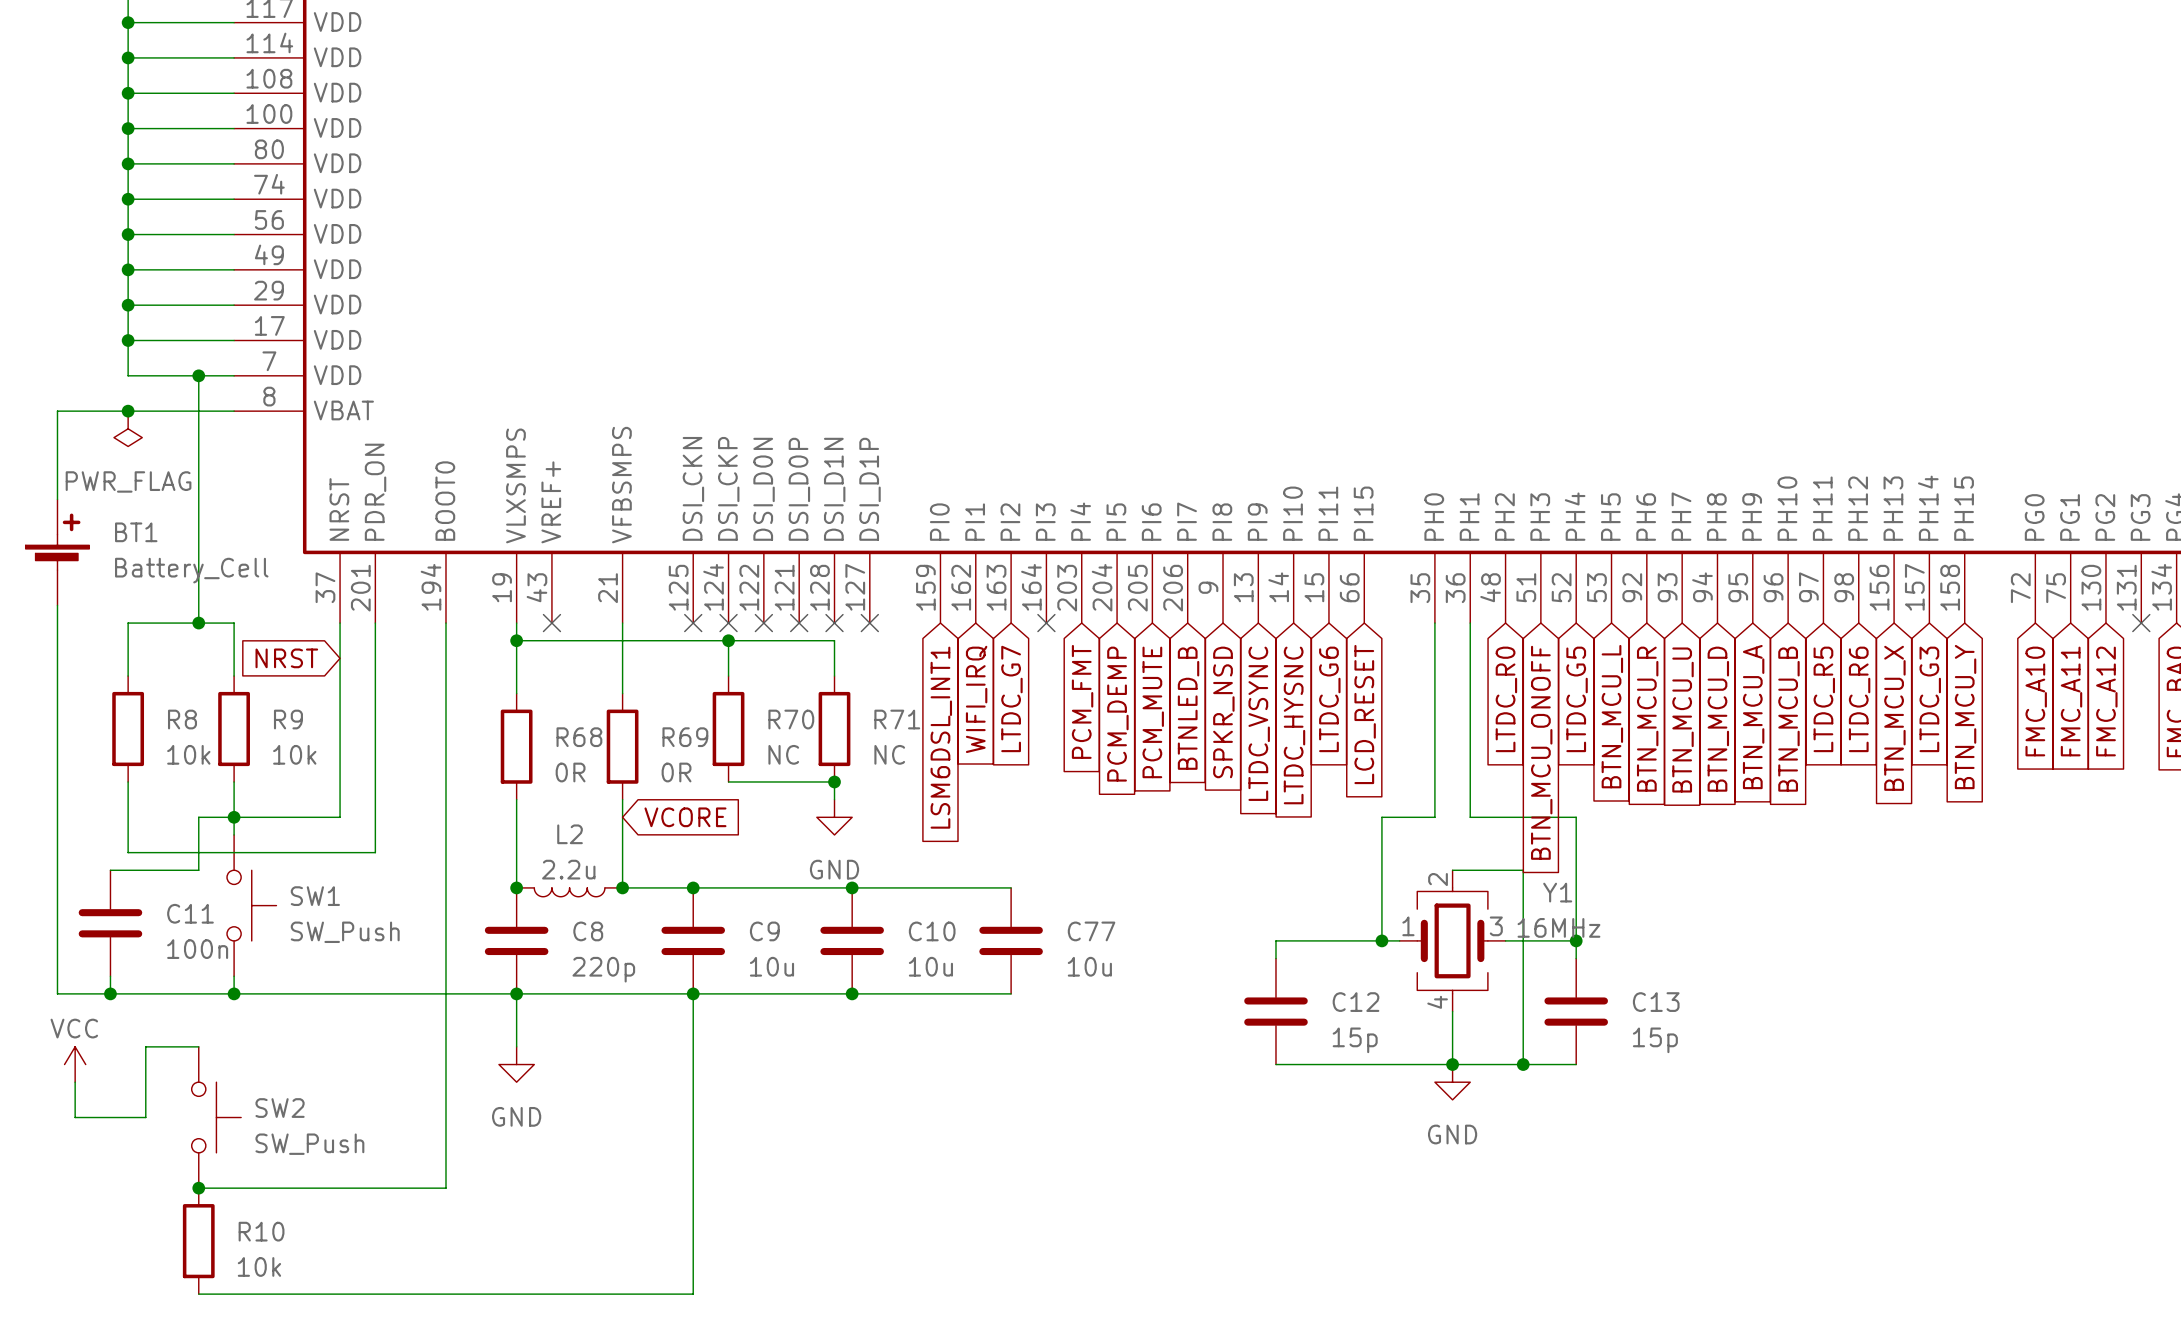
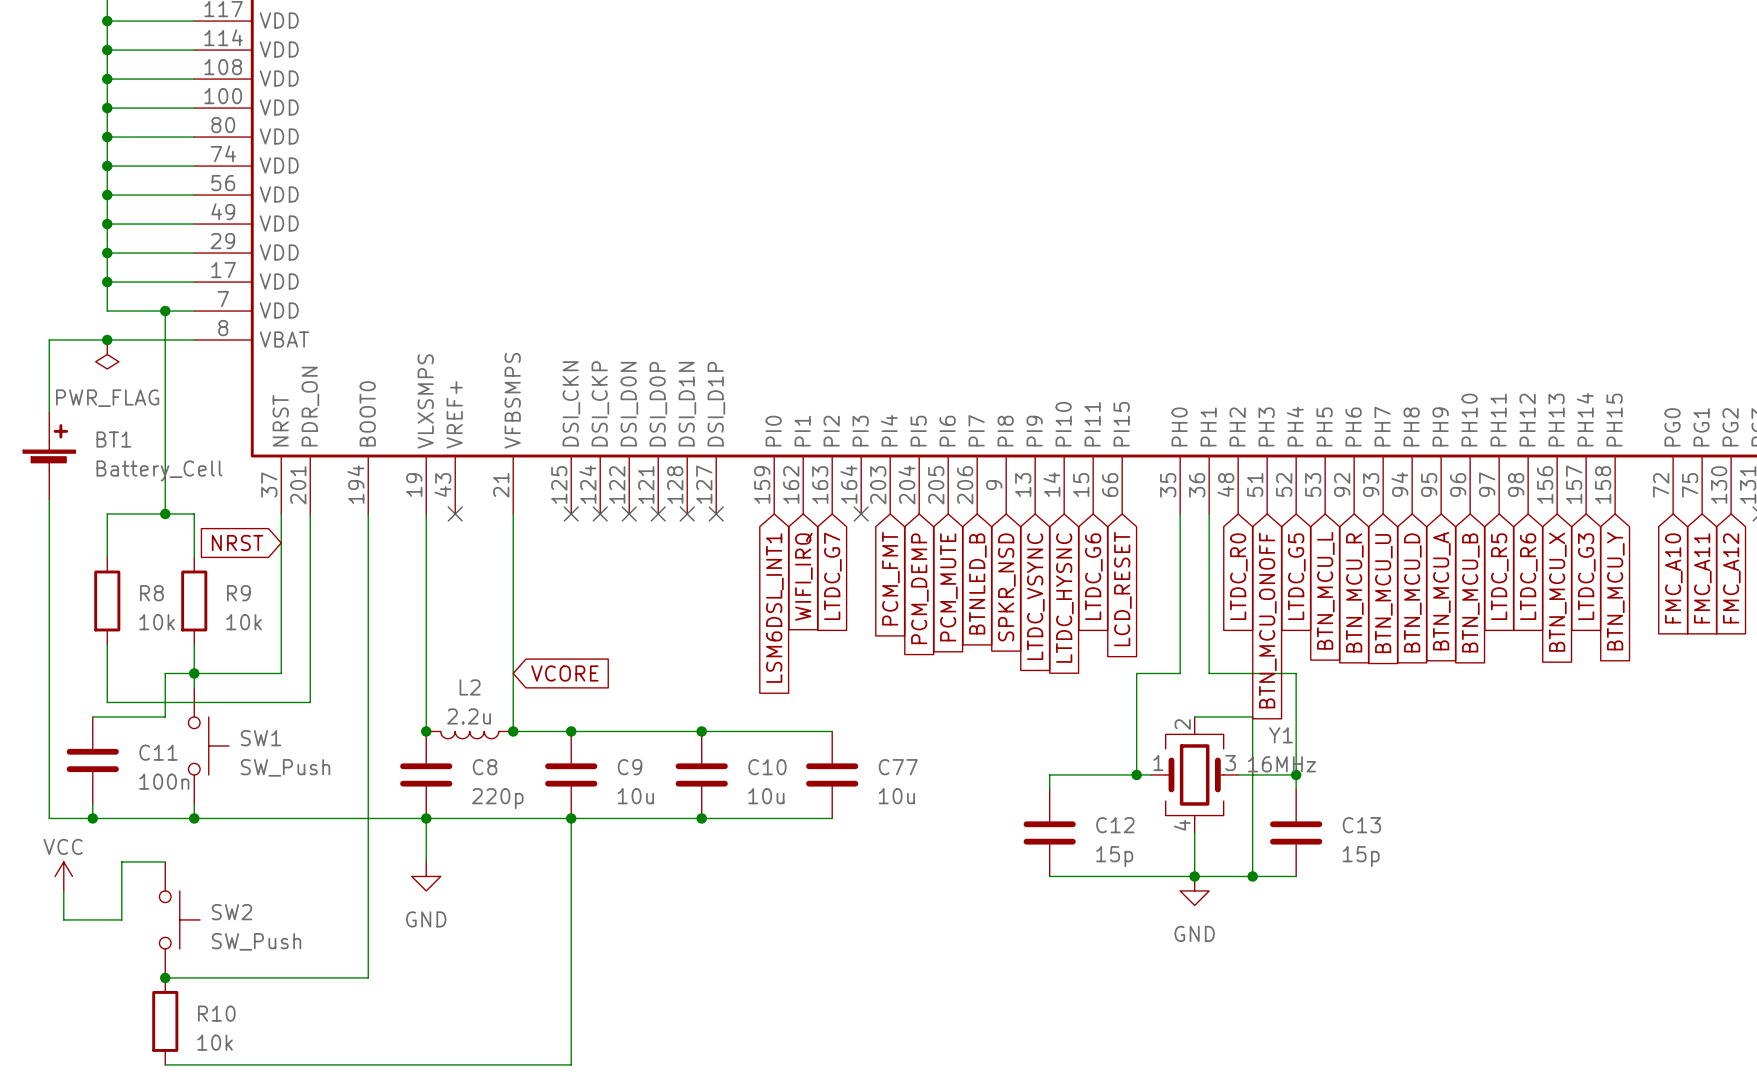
wire: (516, 640) (834, 640) (834, 676) -> none
junction: (516, 640) -> none
wire: (728, 640) (728, 676) -> none
junction: (728, 640) -> none
wire: none -> (426, 571) (426, 658)
wire: none -> (513, 571) (513, 658)
R70: NC (728, 729) -> none
R71: NC (834, 729) -> none
R68: 0R (516, 746) -> none
R69: 0R (622, 746) -> none
wire: (728, 781) (834, 781) (834, 799) -> none
junction: (834, 781) -> none
power symbol: GND (834, 817) -> none

